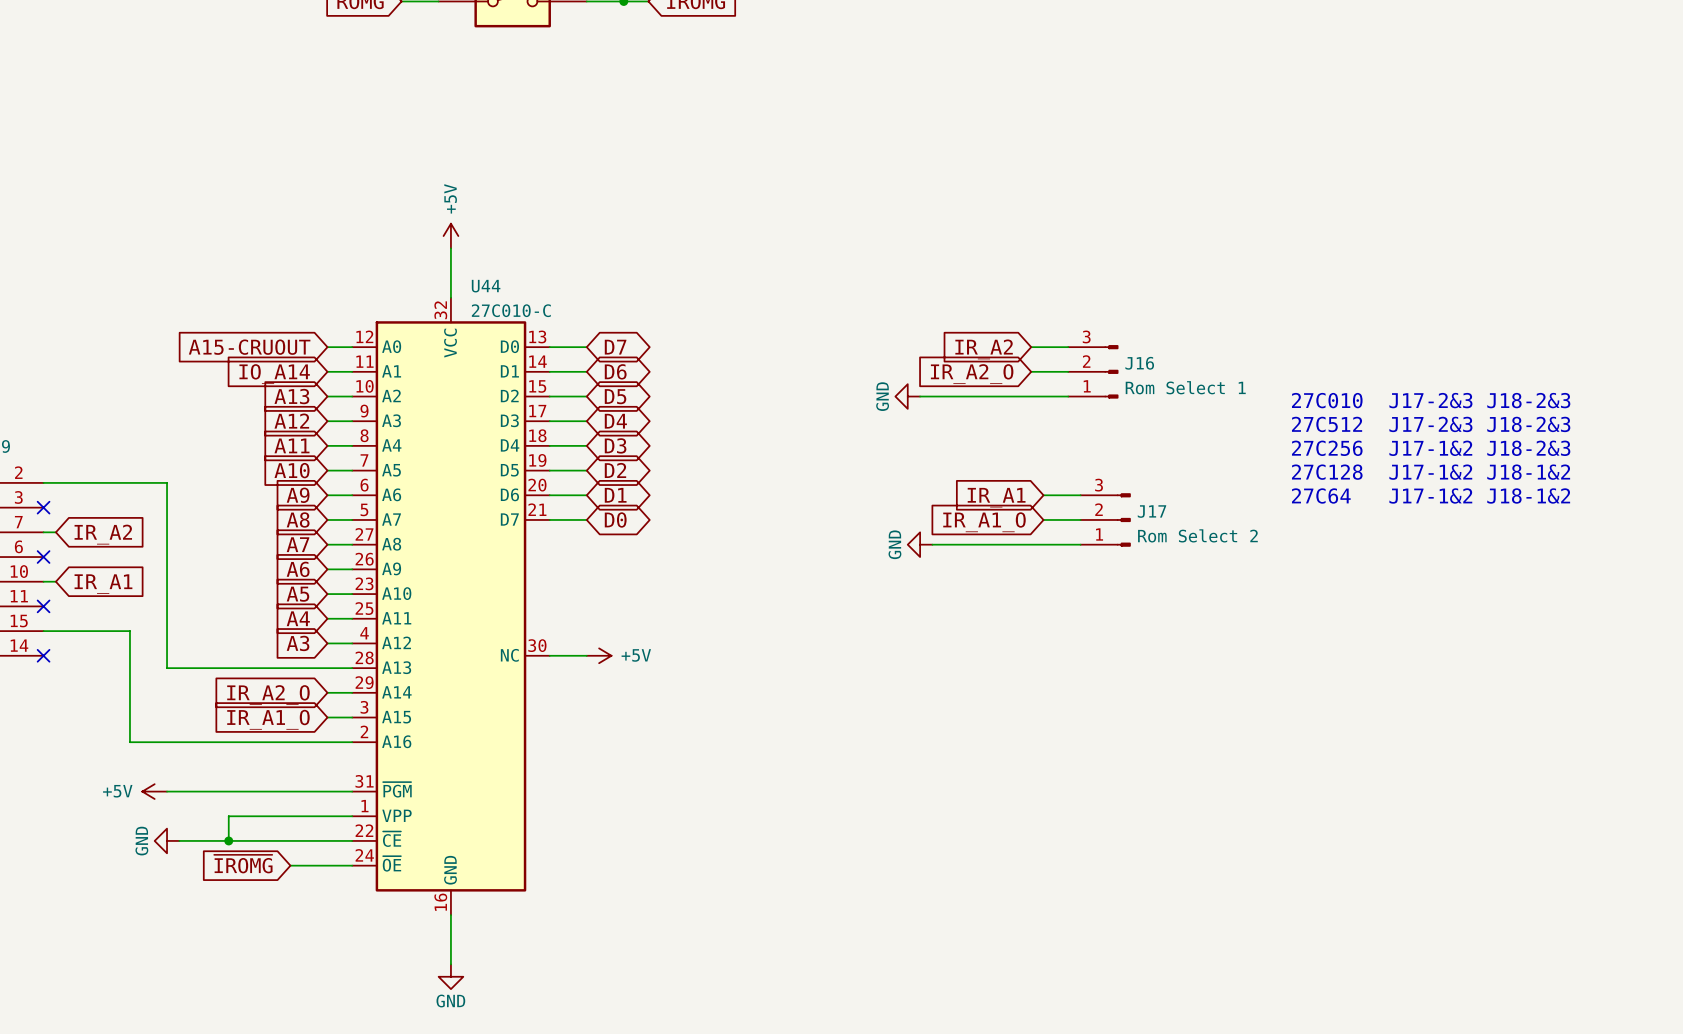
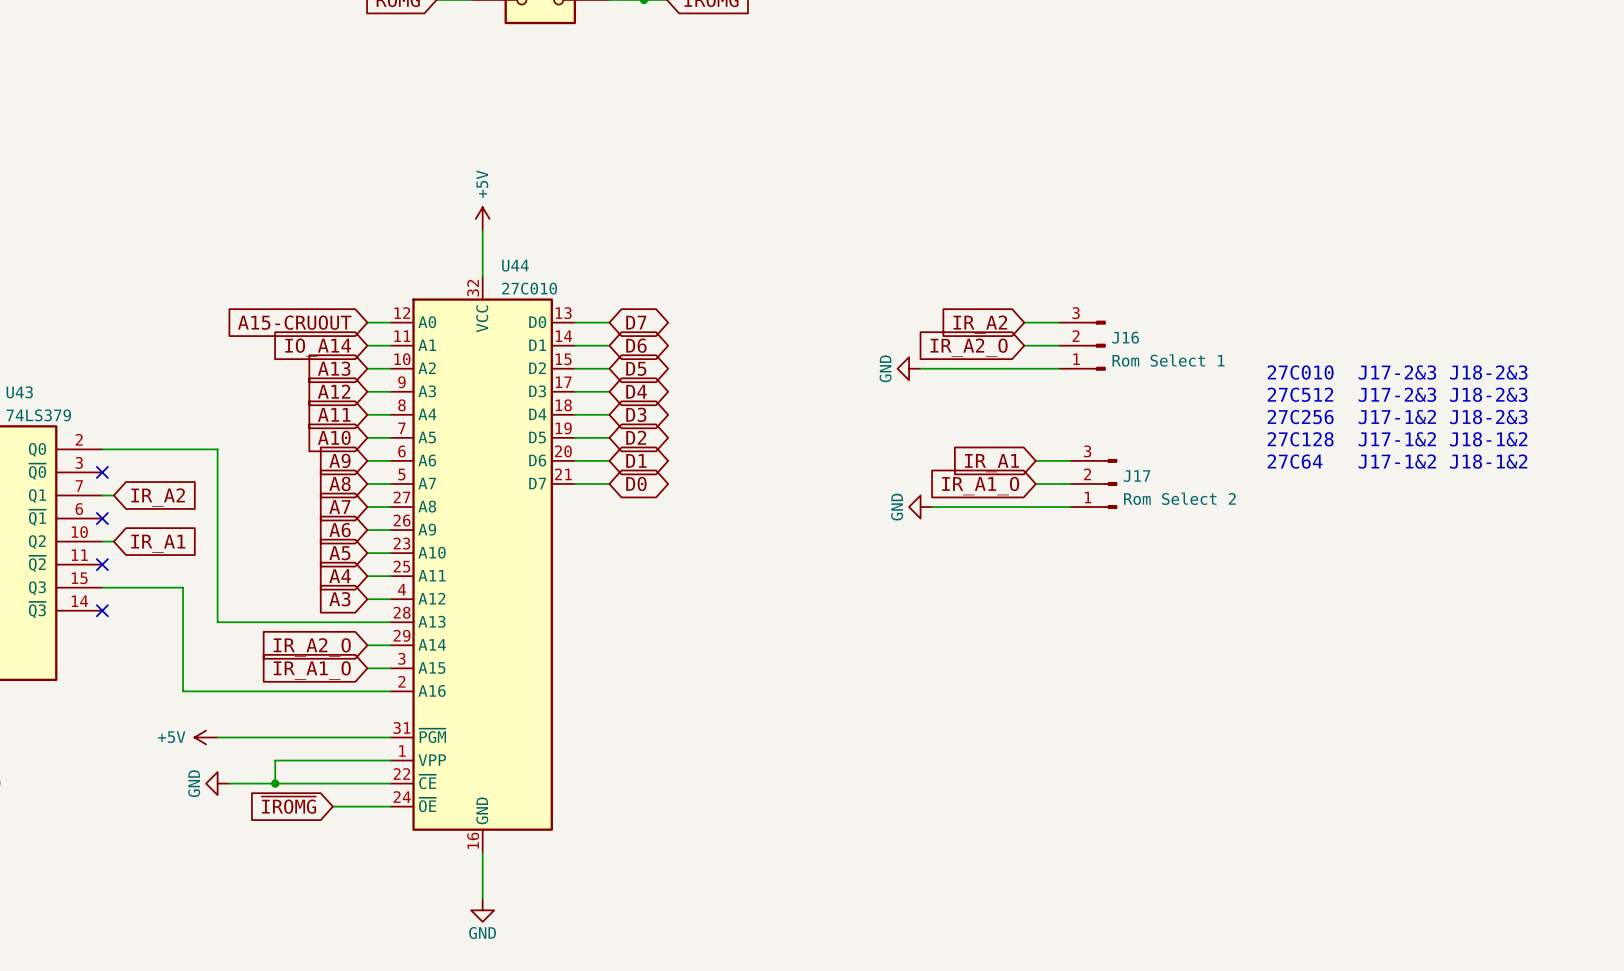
U44 symbol: [352, 297, 550, 916] -> [390, 276, 575, 853]
U44 value: 27C010-C (511, 310) -> 27C010 (529, 288)
wire: (549, 655) (586, 655) -> none
power symbol: +5V (599, 655) -> none

